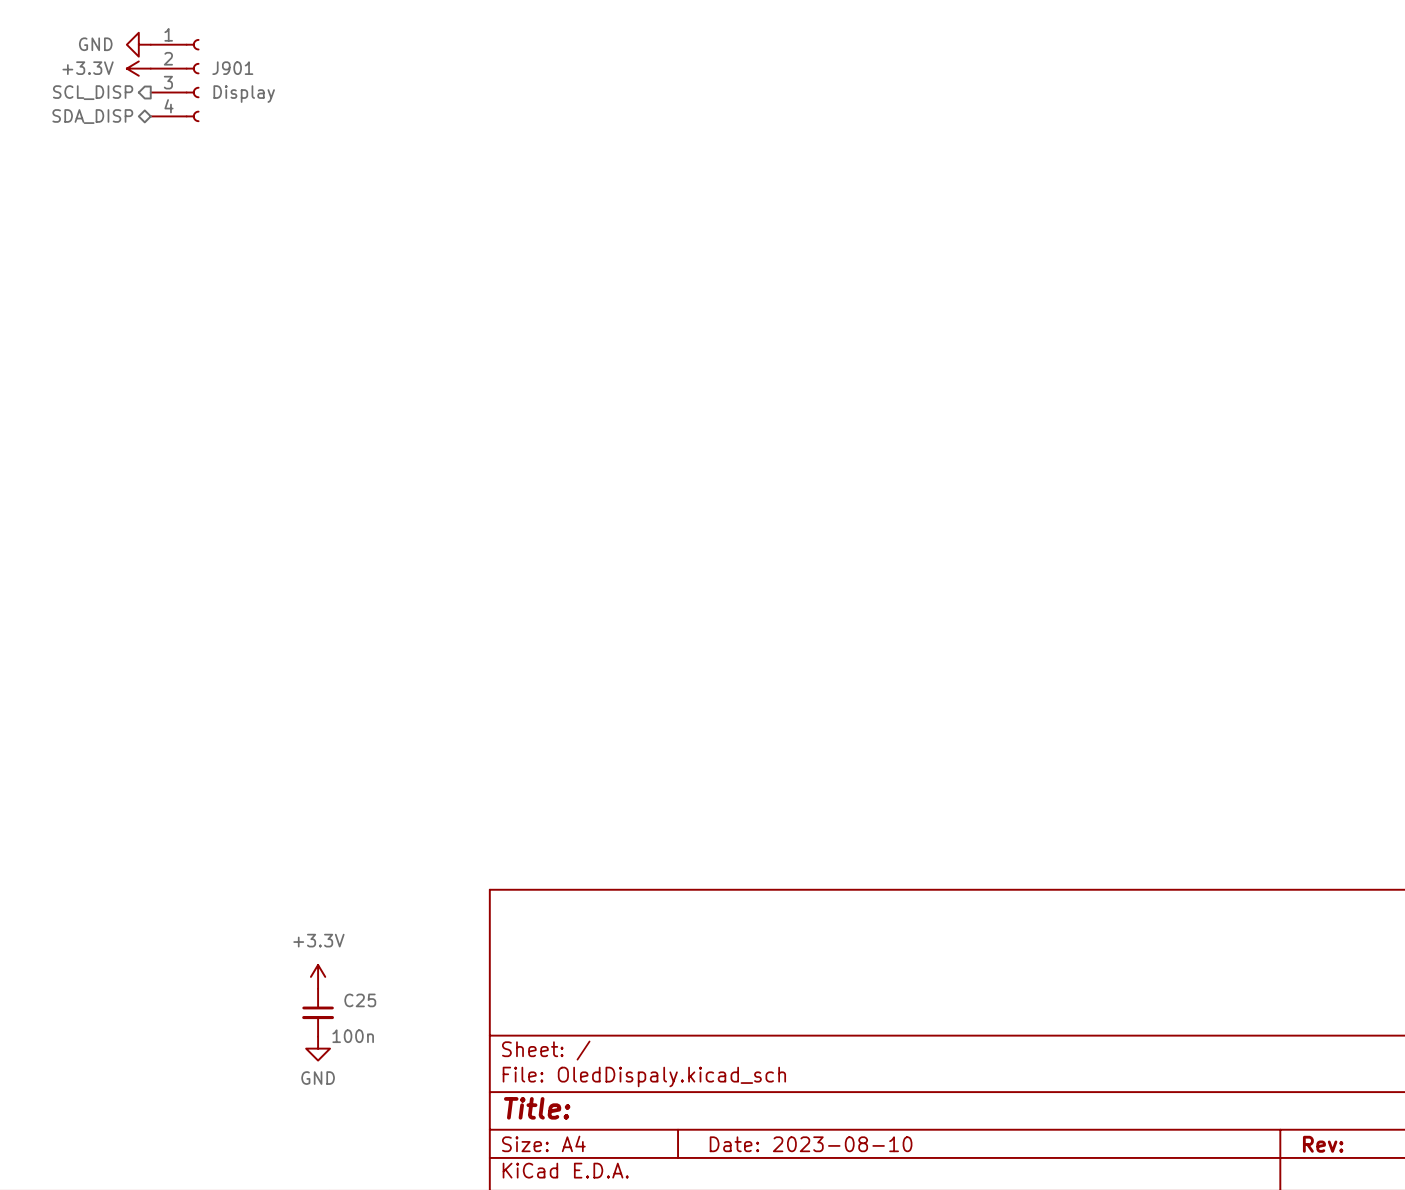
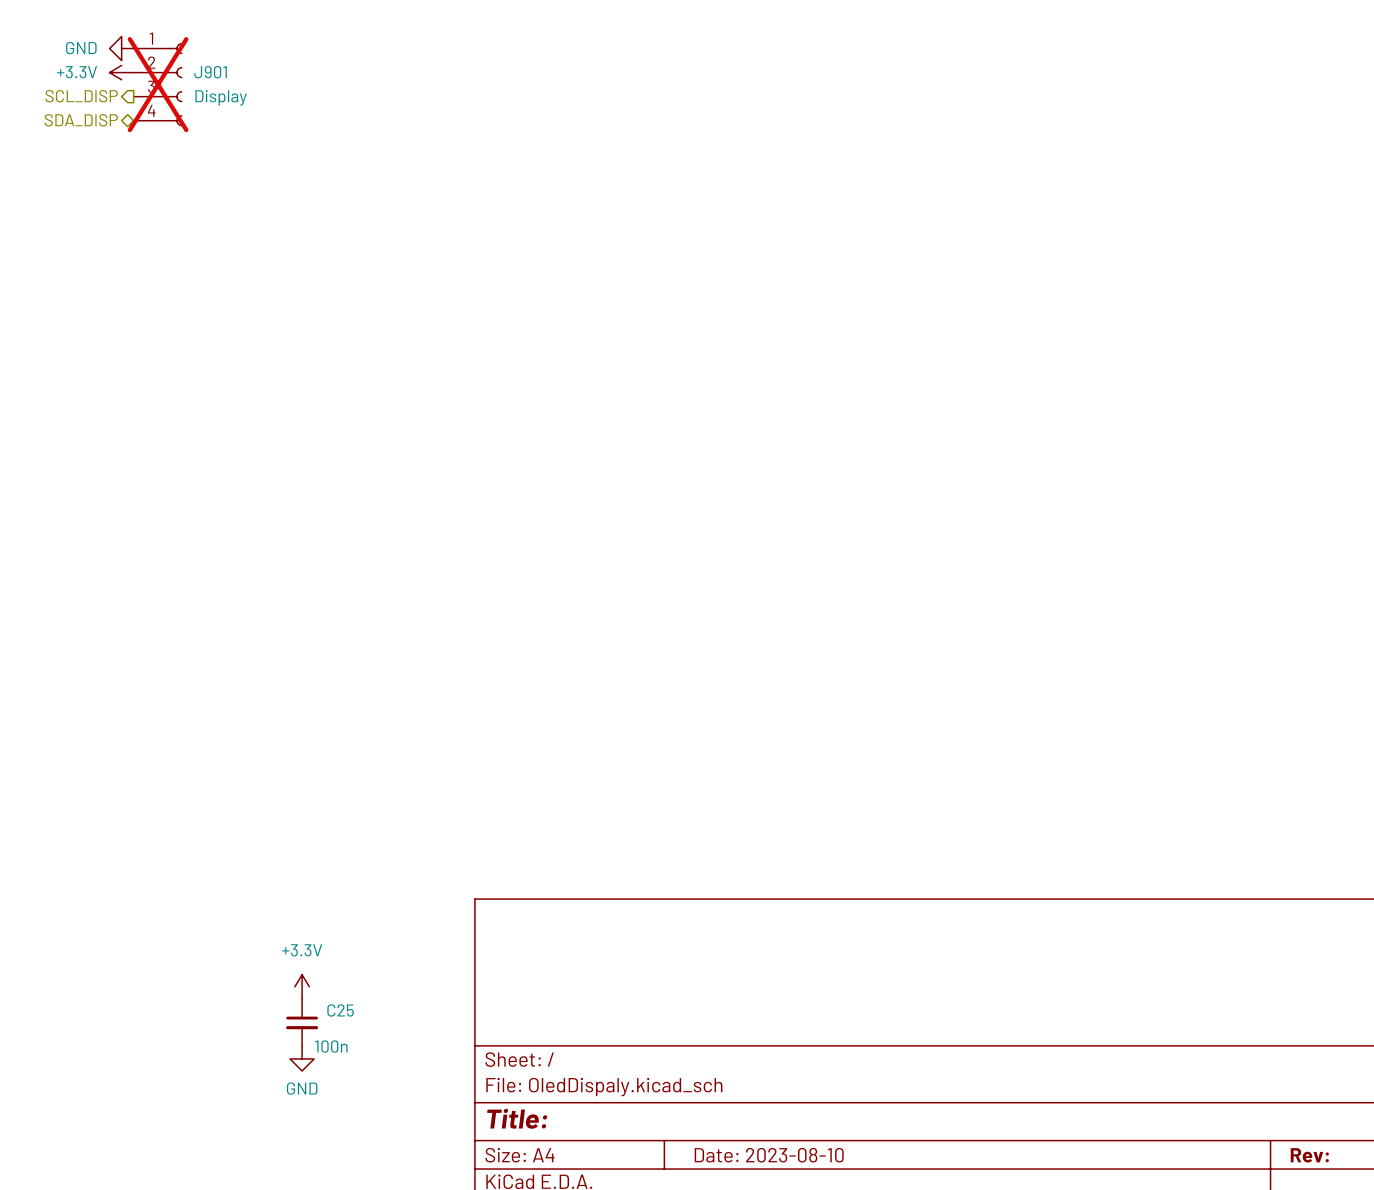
J901 do-not-place cross: none -> (158, 84)

